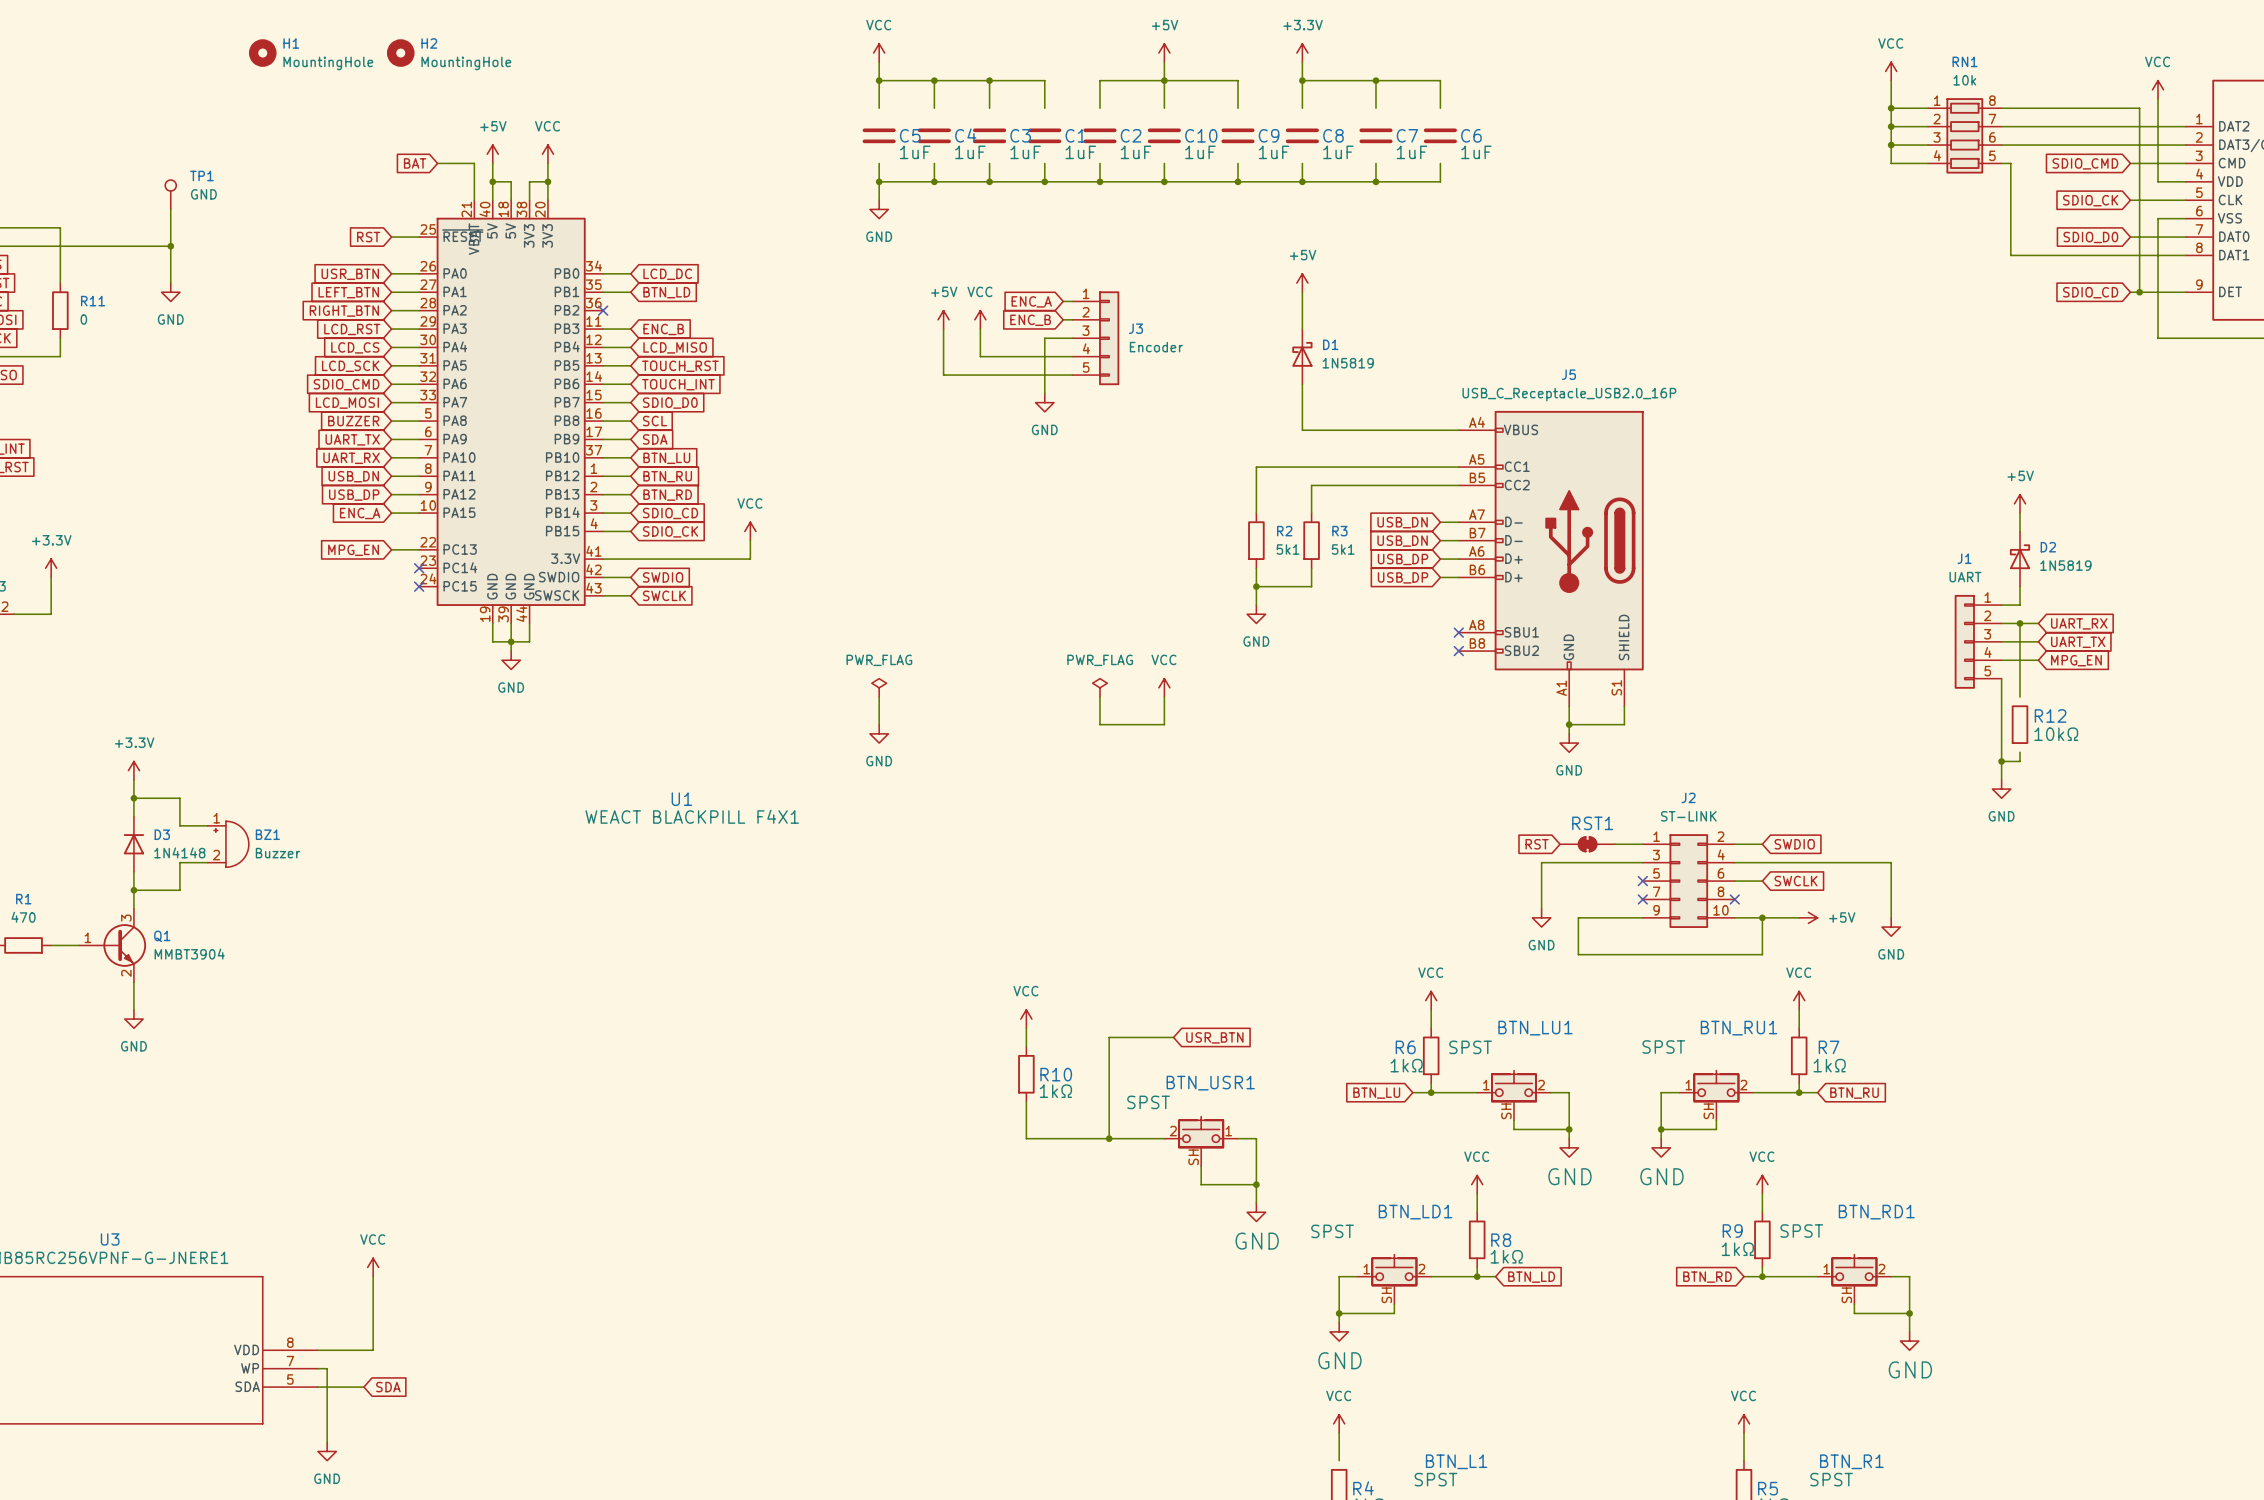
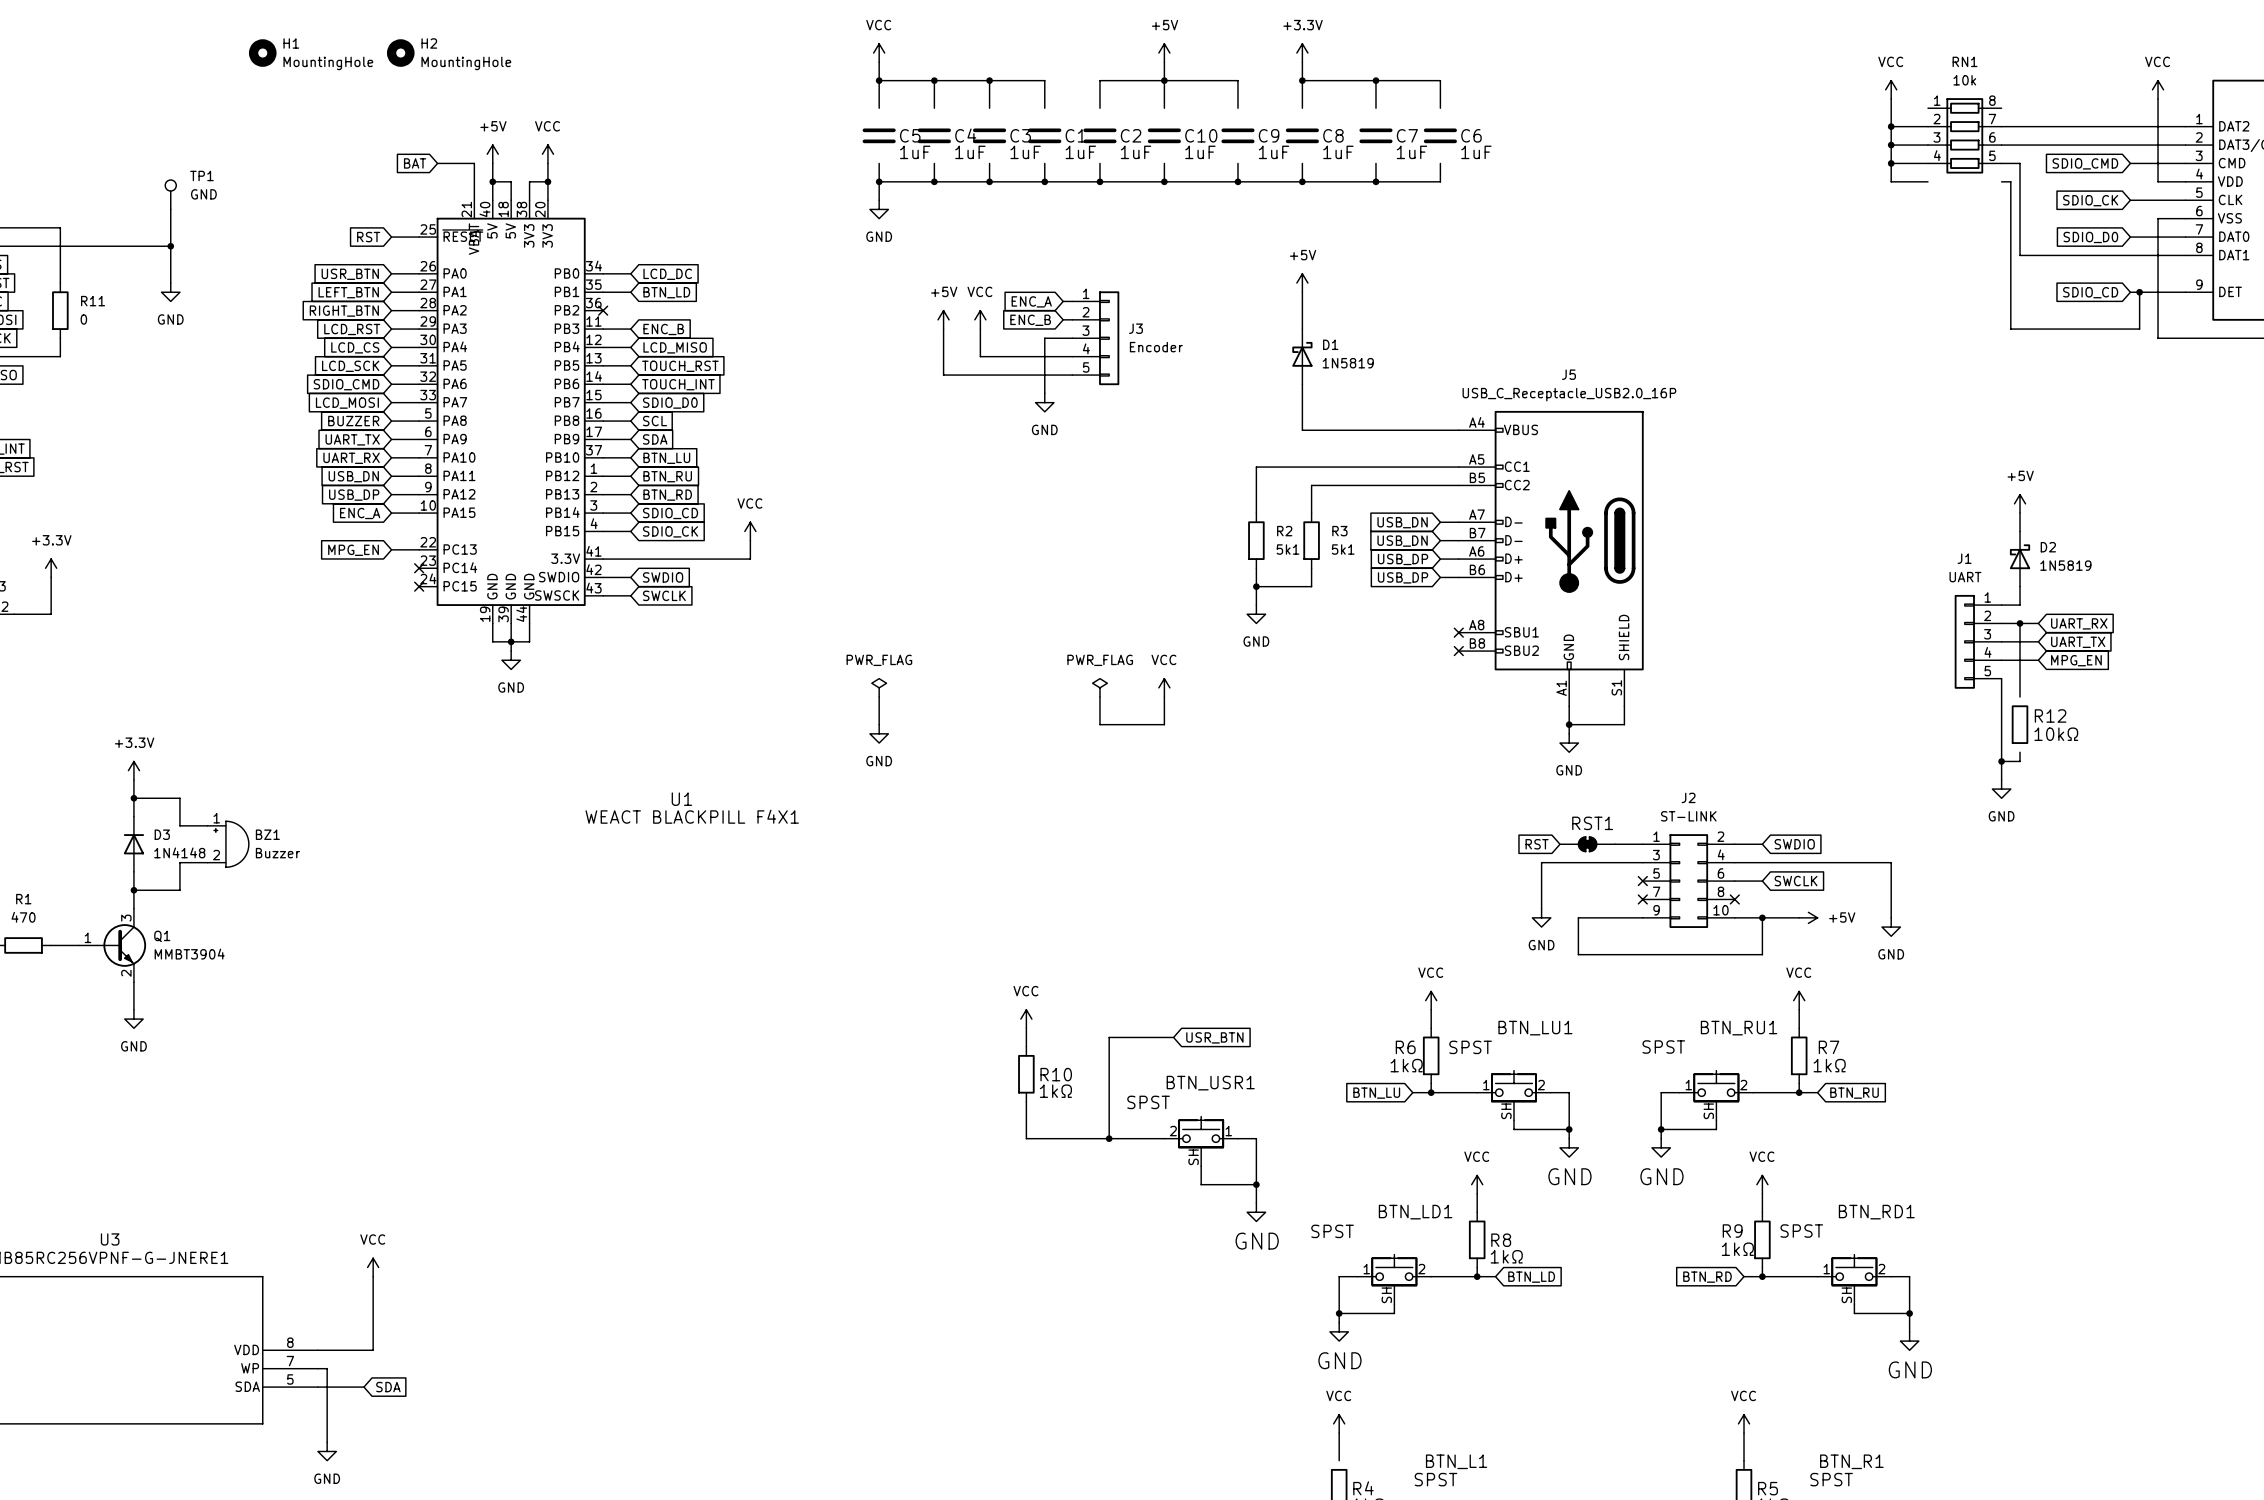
power symbol position: VCC (1891, 71) -> VCC (1891, 89)
wire: (1891, 108) (1928, 108) -> none
junction: (1891, 108) -> none
wire: (2001, 108) (2139, 108) (2139, 292) -> (2010, 255) (2010, 329) (2139, 329) (2139, 292)
wire: none -> (1891, 163) (1891, 181) (1928, 181)
junction: none -> (1891, 163)
wire: (2010, 163) (2010, 181) -> (2001, 181) (2010, 181)
wire: (2010, 255) (2020, 255) -> (2010, 163) (2020, 163) (2020, 255)

